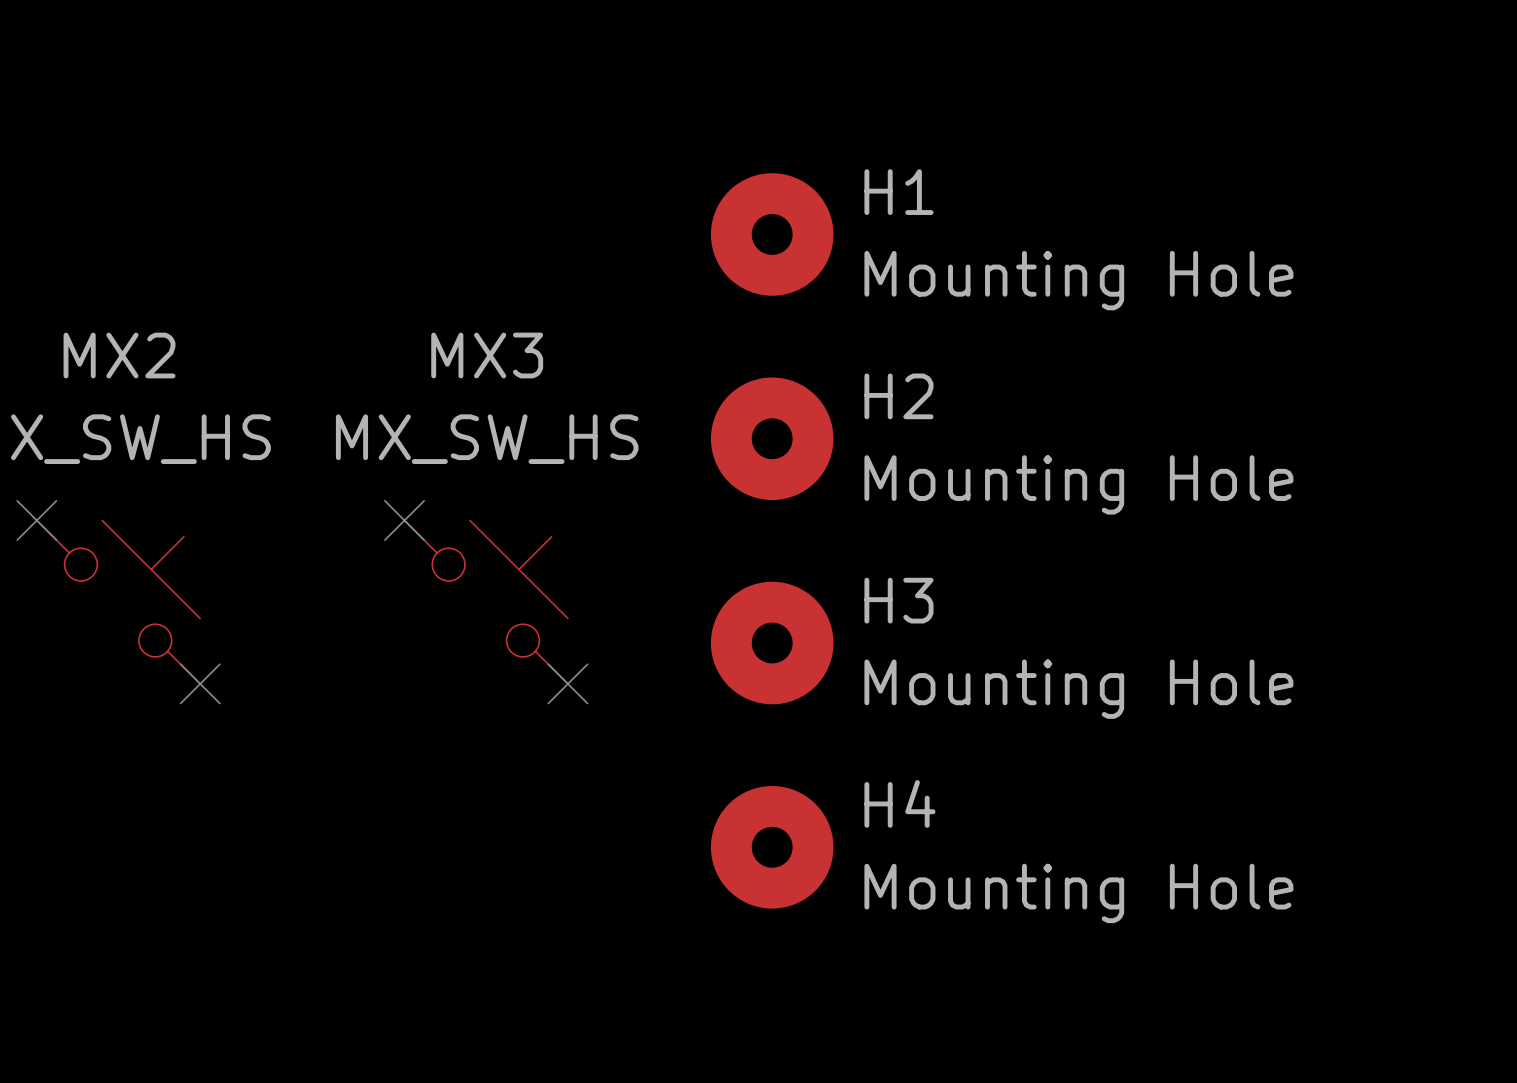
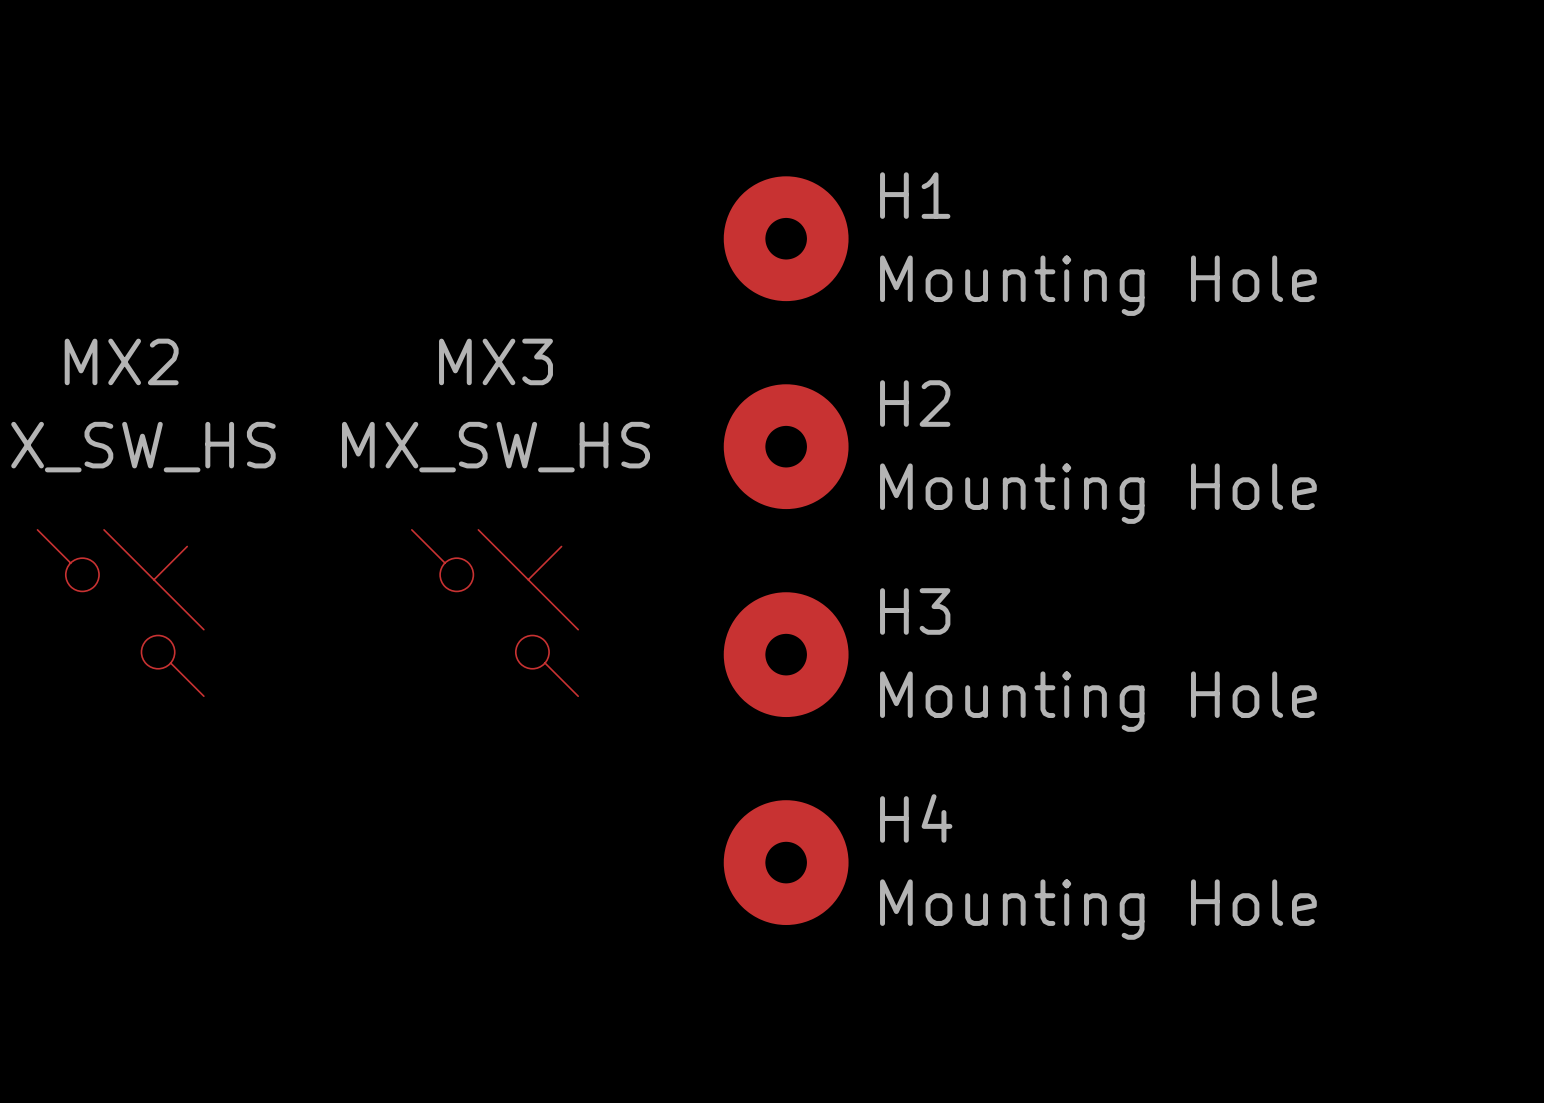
no-connect mark: (36, 520) -> none
no-connect mark: (404, 520) -> none
no-connect mark: (200, 683) -> none
no-connect mark: (567, 683) -> none

